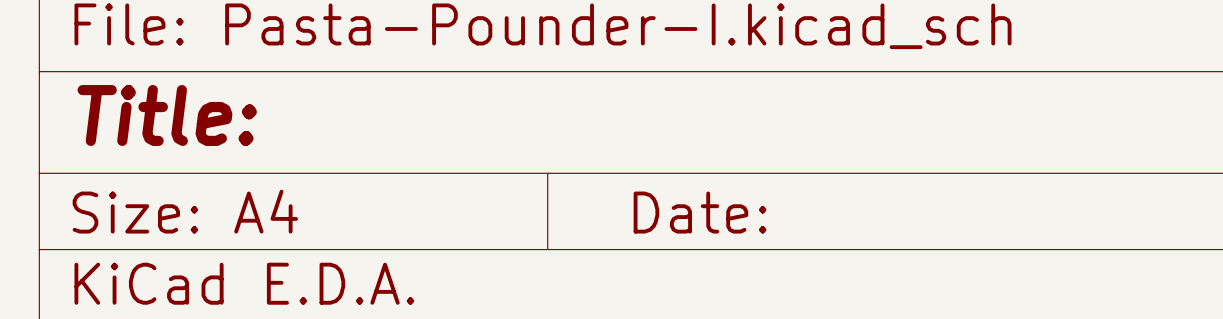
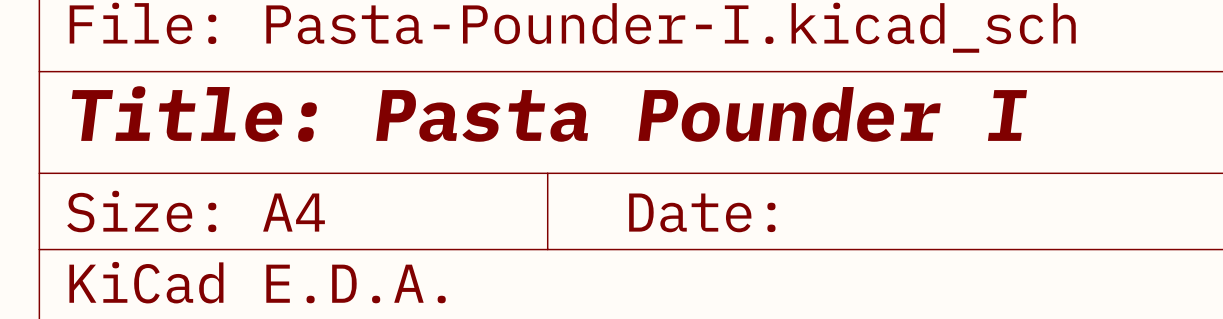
title block: Title: (167, 115) -> Title: Pasta Pounder I (549, 114)

